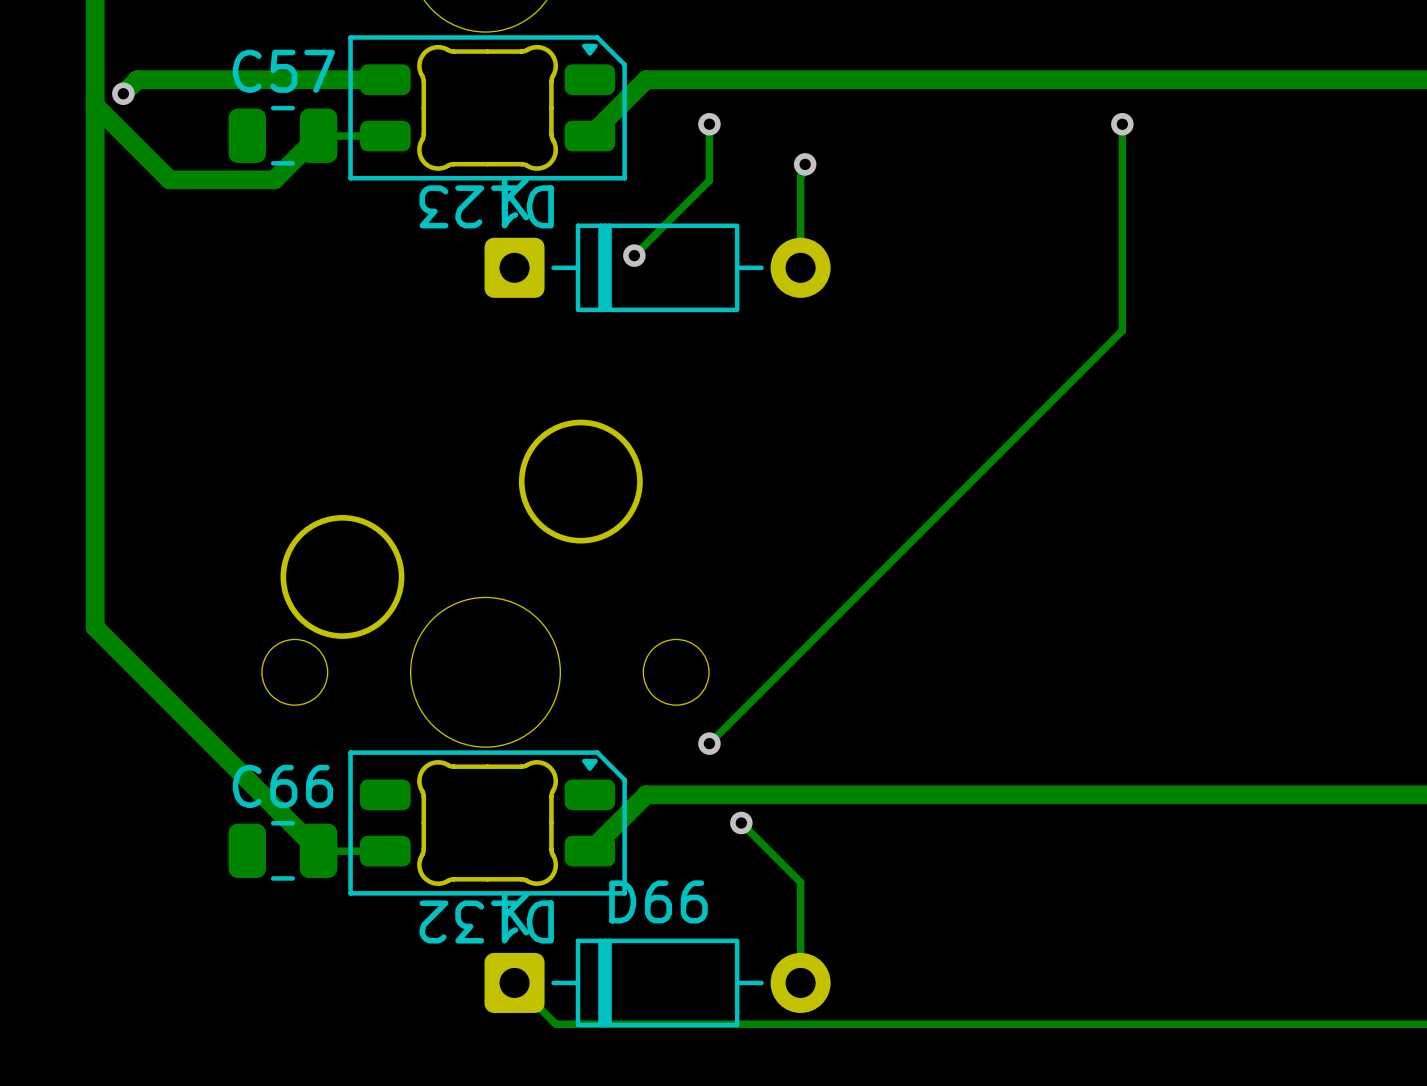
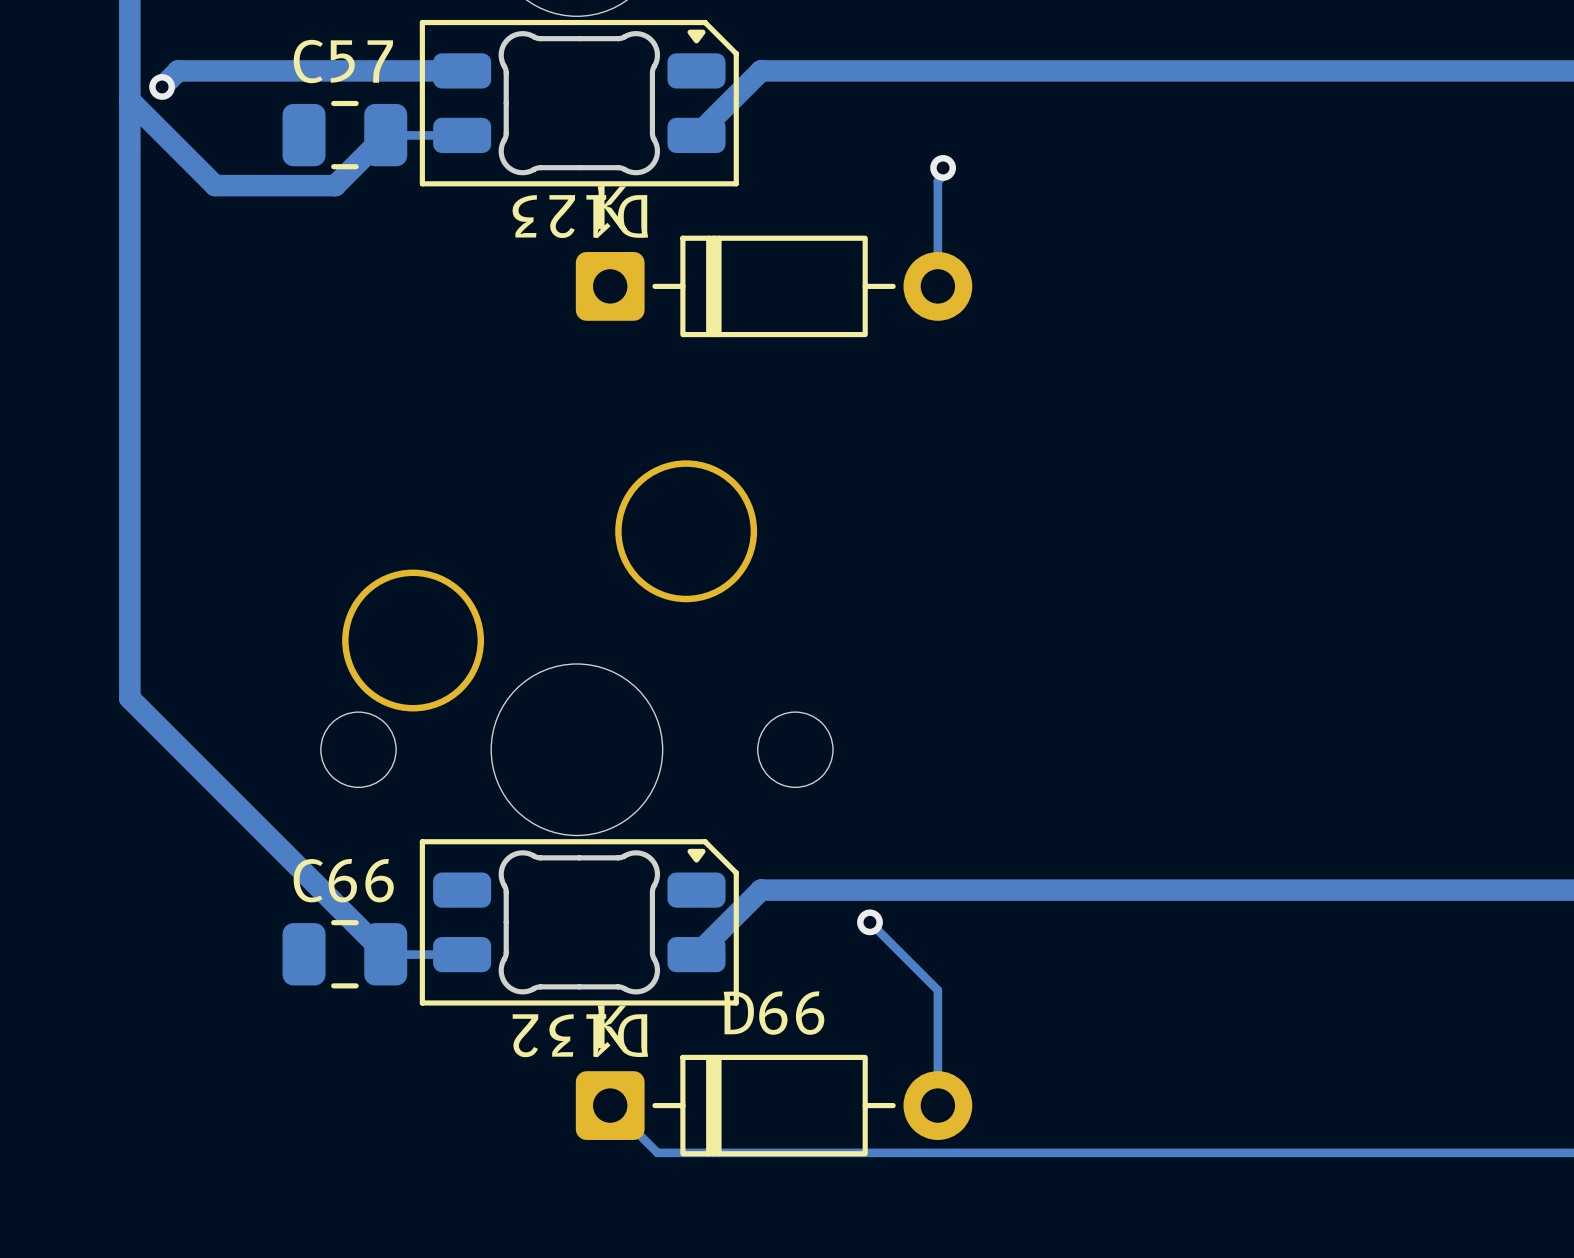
track: (709, 124) (709, 180) (634, 255) -> none
via: (709, 124) -> none
track: (1122, 124) (1122, 330) (709, 743) -> none
via: (1122, 124) -> none
via: (634, 255) -> none
via: (709, 743) -> none

